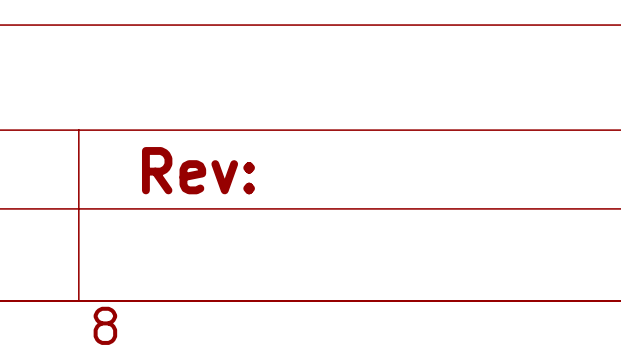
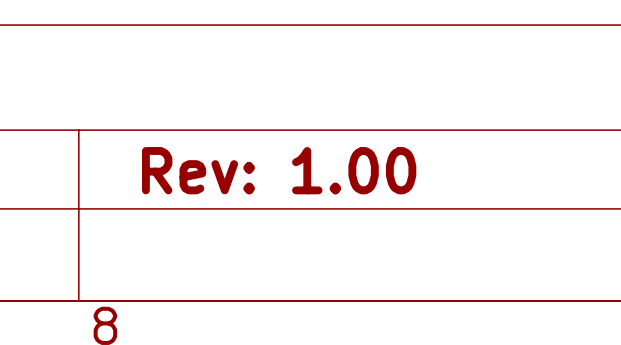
title block: Rev: (198, 170) -> Rev: 1.00 (279, 170)

